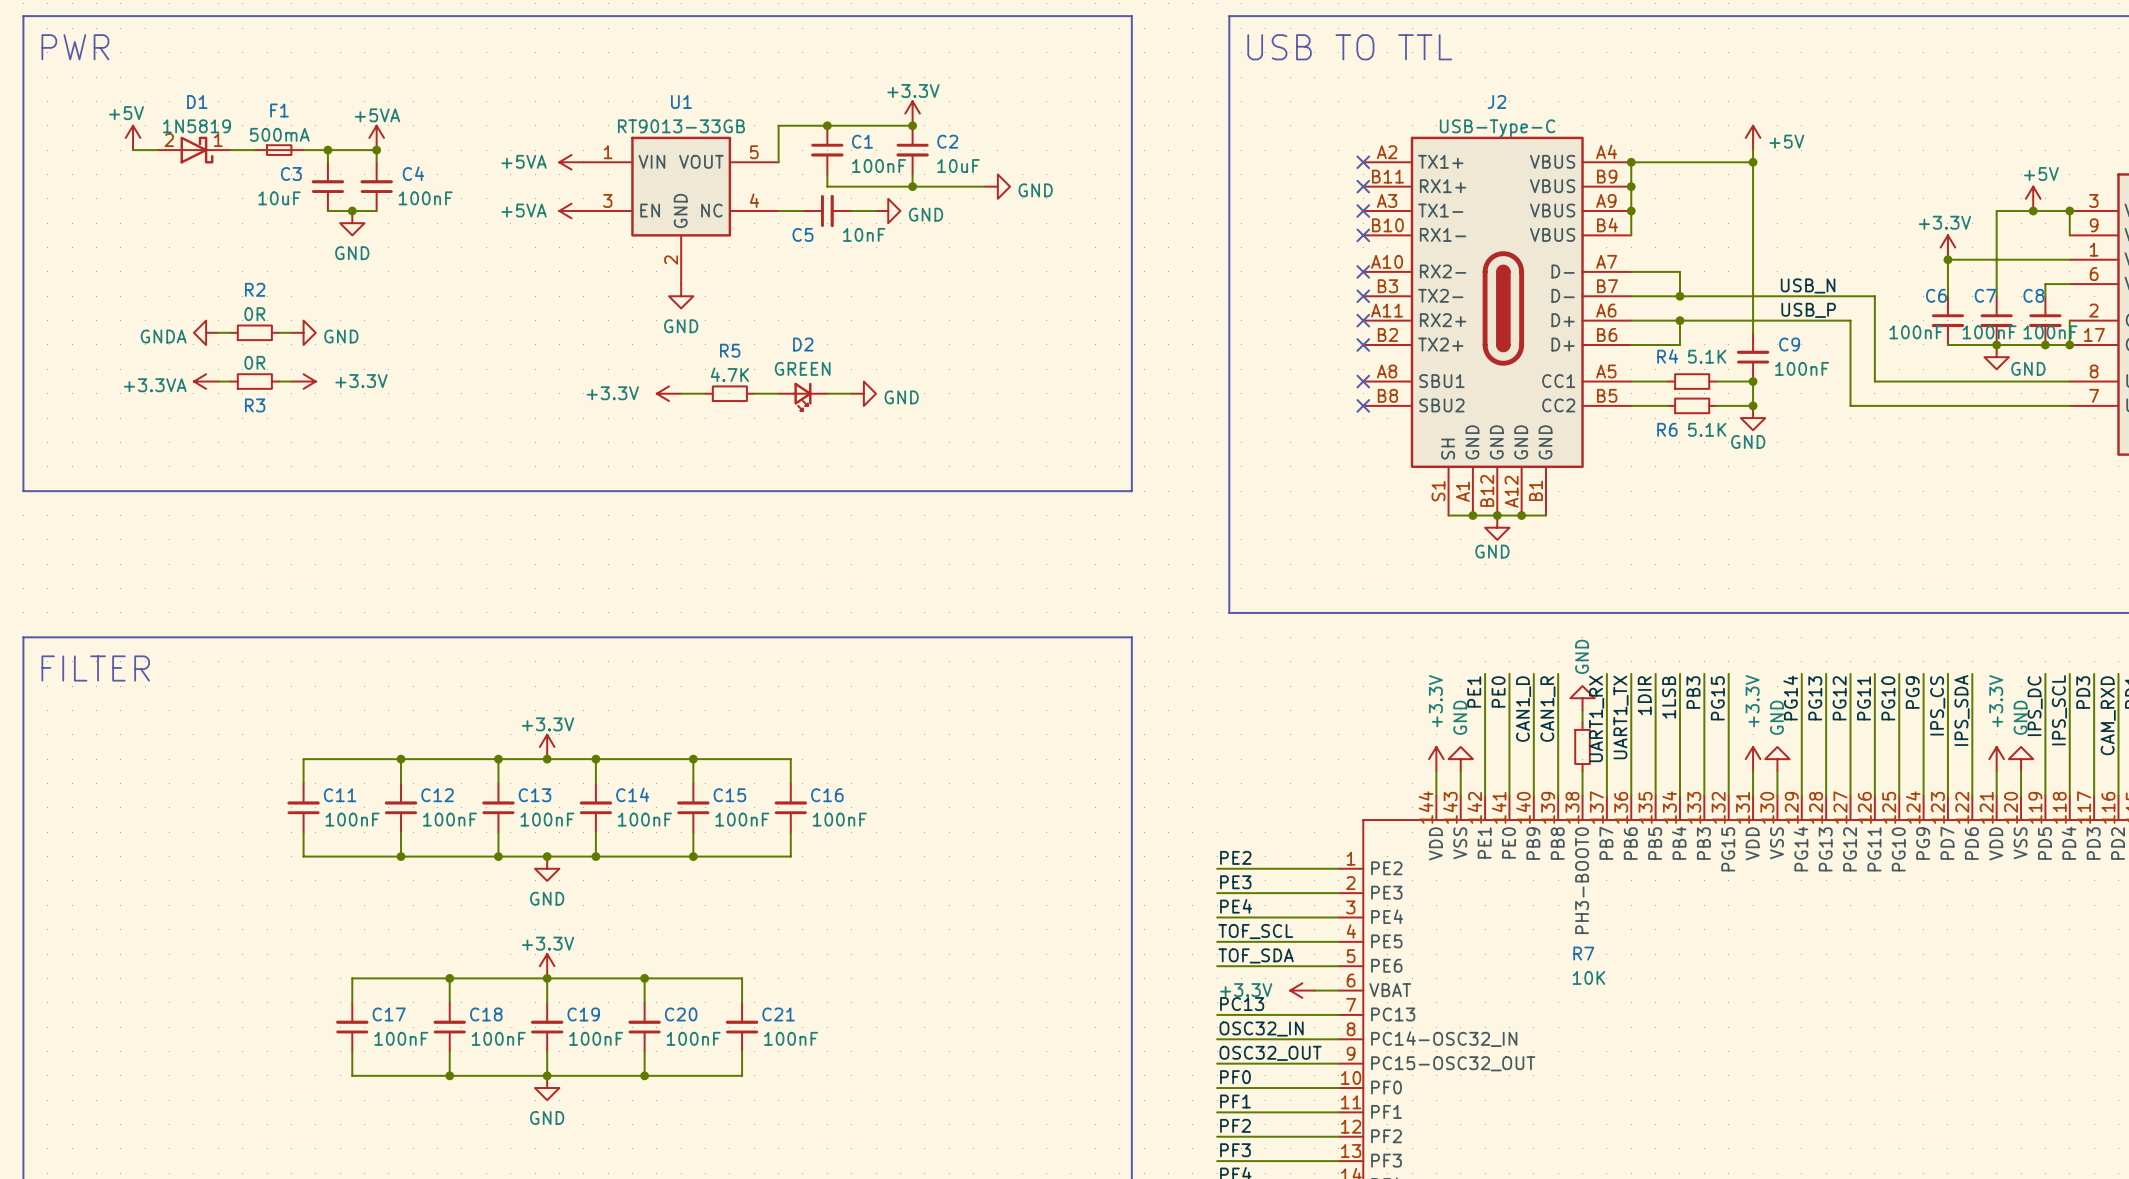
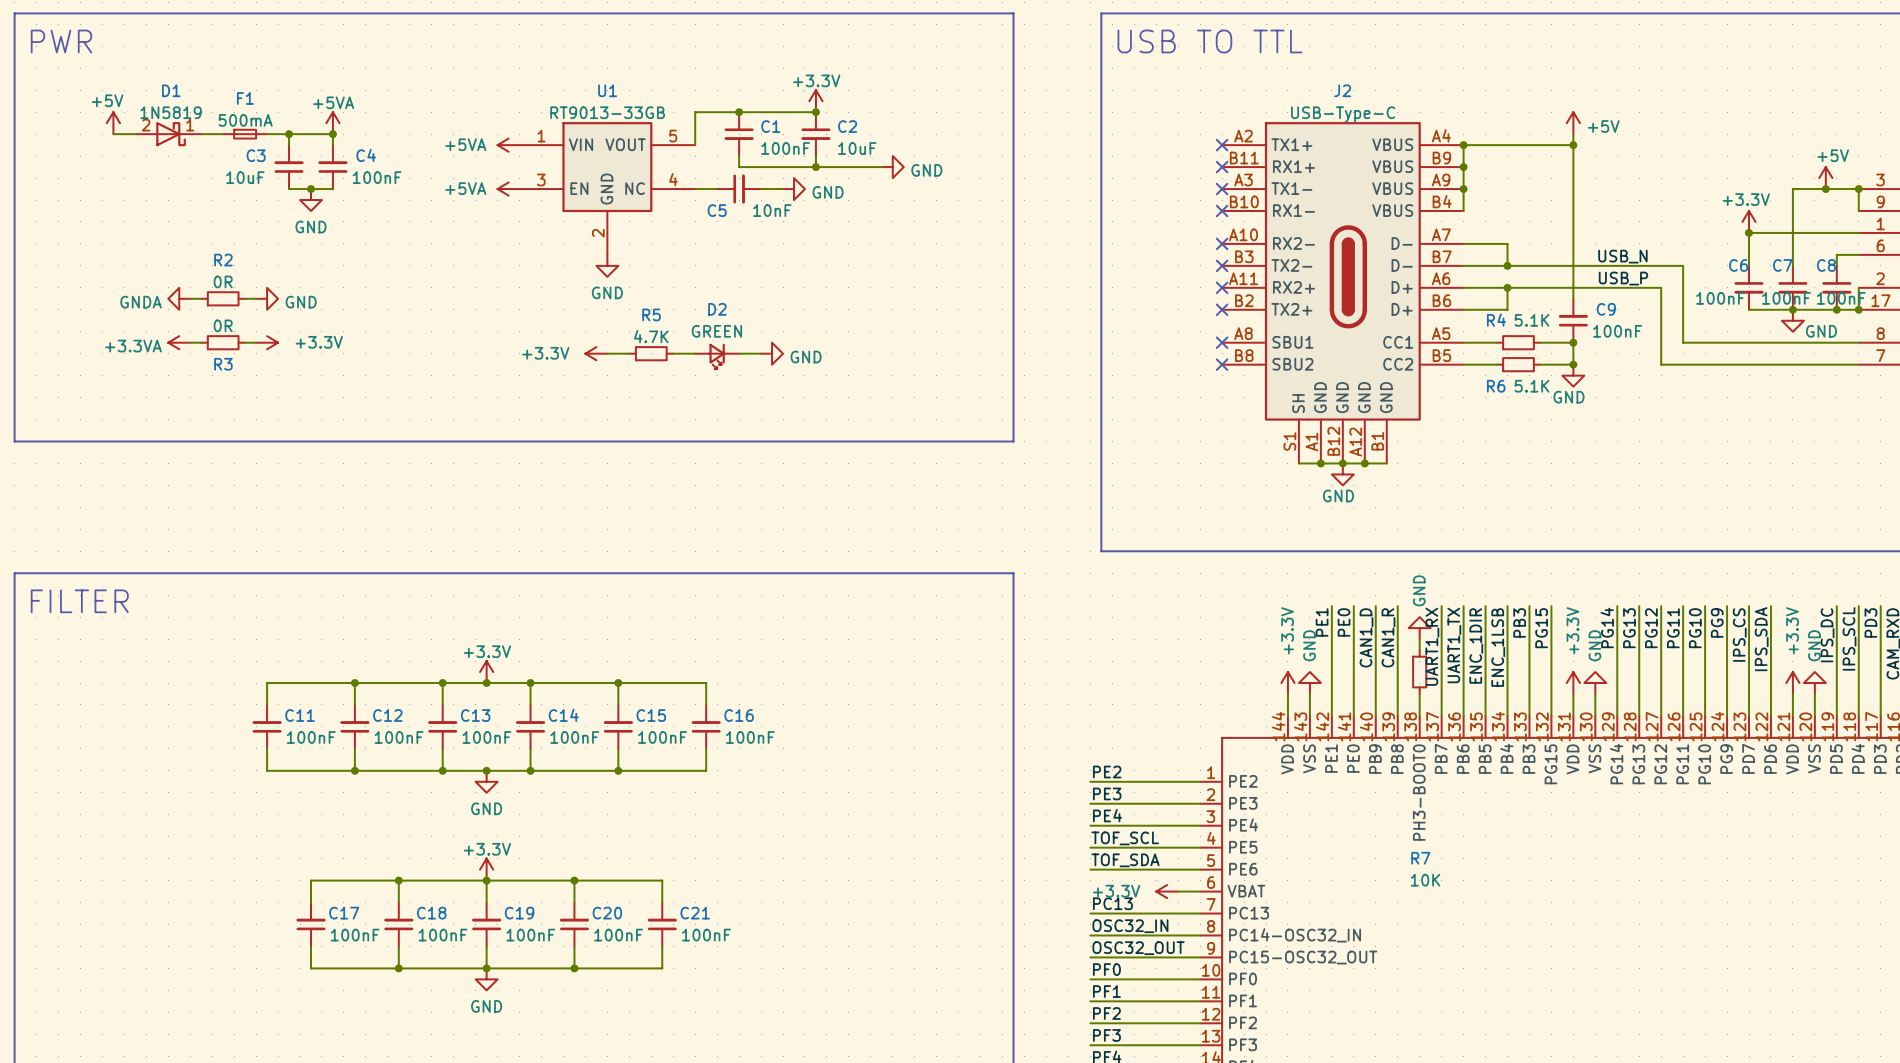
label: 1DIR (1644, 695) -> ENC_1DIR (1476, 645)
label: 1LSB (1669, 697) -> ENC_1LSB (1498, 647)

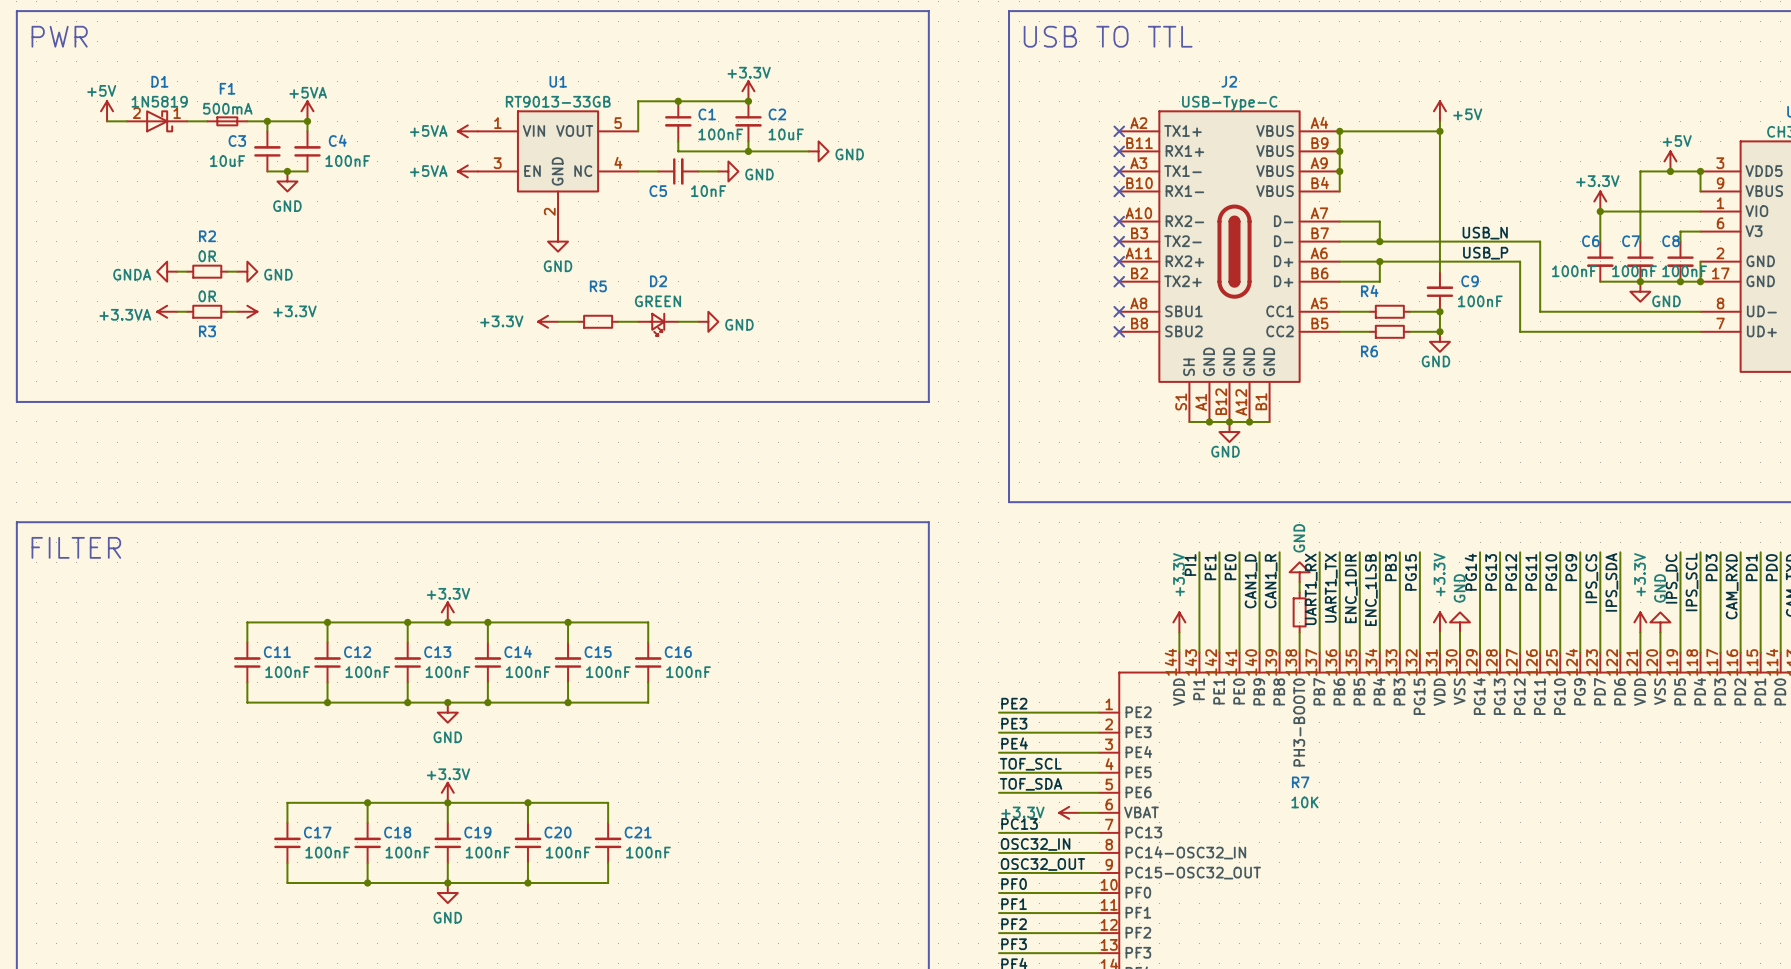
R4 value: 5.1K (1531, 320) -> none
R5 value: 4.7K (651, 336) -> none
R6 value: 5.1K (1531, 386) -> none
wire: none -> (1199, 552) (1199, 632)
label: none -> PI1 (1190, 565)
power symbol: GND (1309, 683) -> none
part pin name: VSS (1309, 758) -> PI1 (1199, 689)

